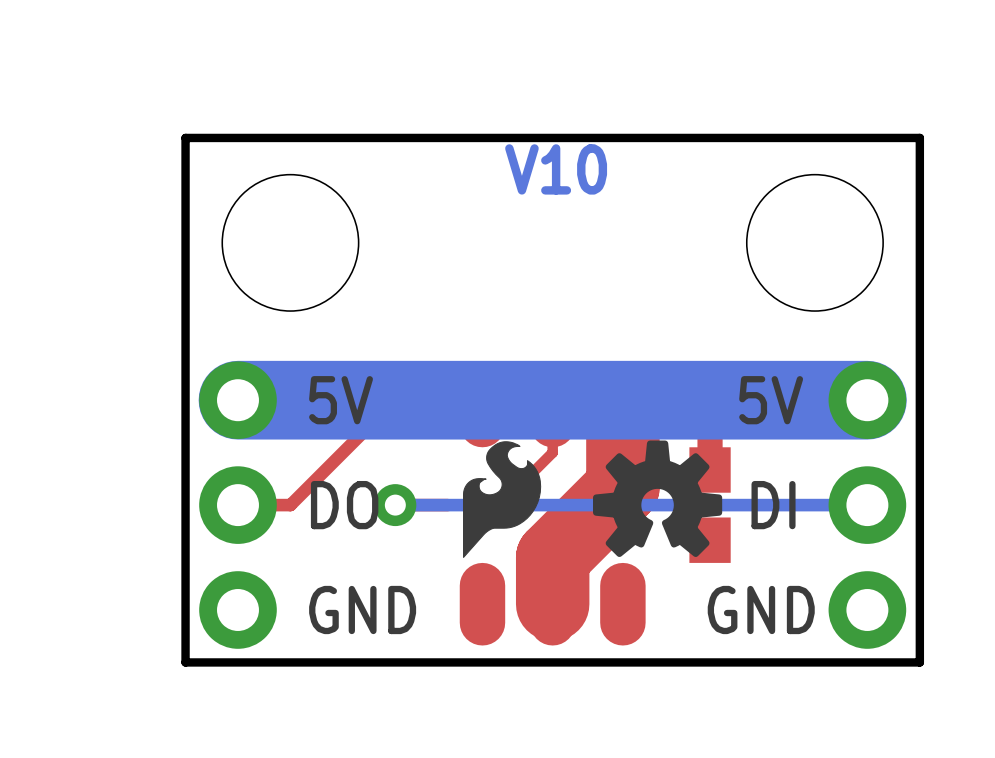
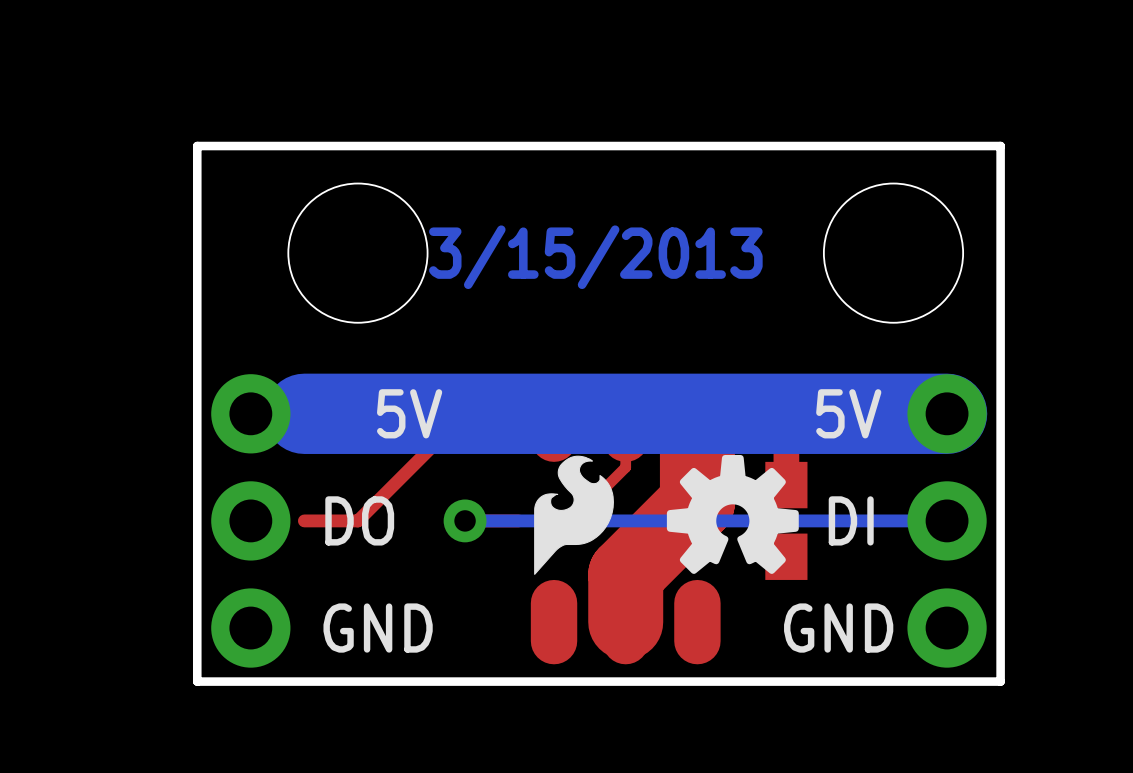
board edge: (185, 137) (185, 662) -> (250, 146) (197, 146) (197, 681) (250, 681)
text: V10 (556, 169) -> none
text: none -> 3/15/2013 (595, 257)
part position: (237, 505) -> (250, 520)
text position: DO (344, 505) -> DO (359, 520)
text position: GND (362, 610) -> GND (378, 628)

